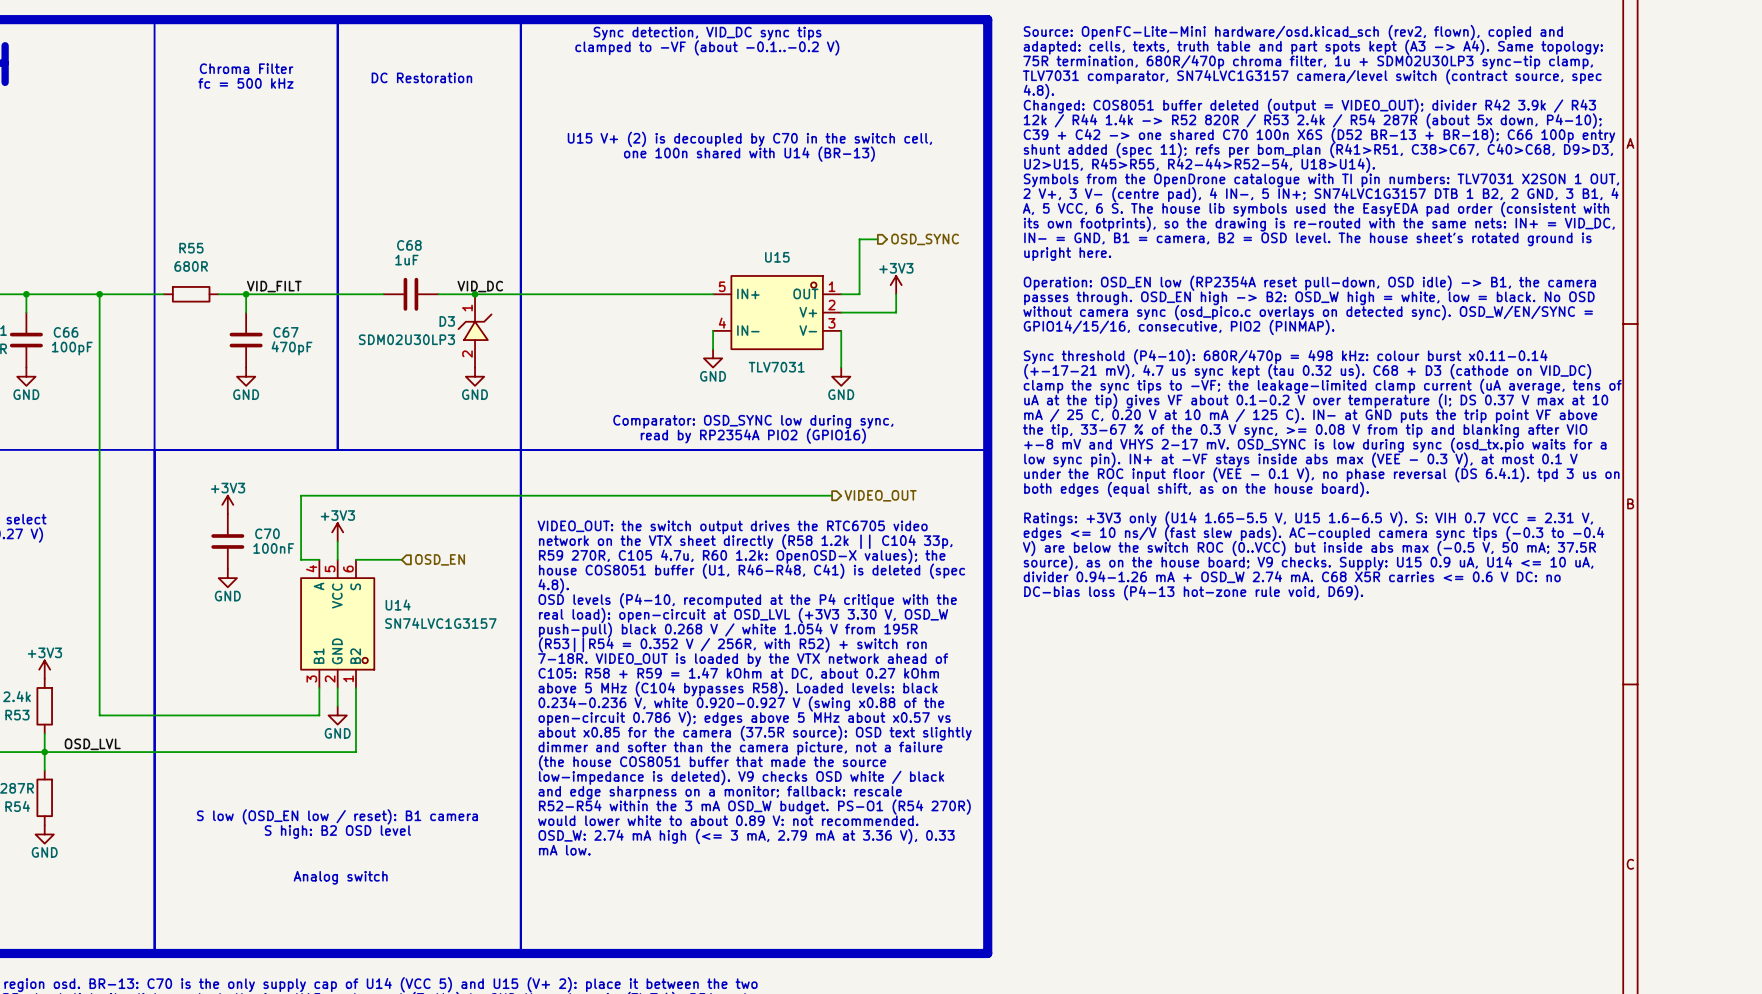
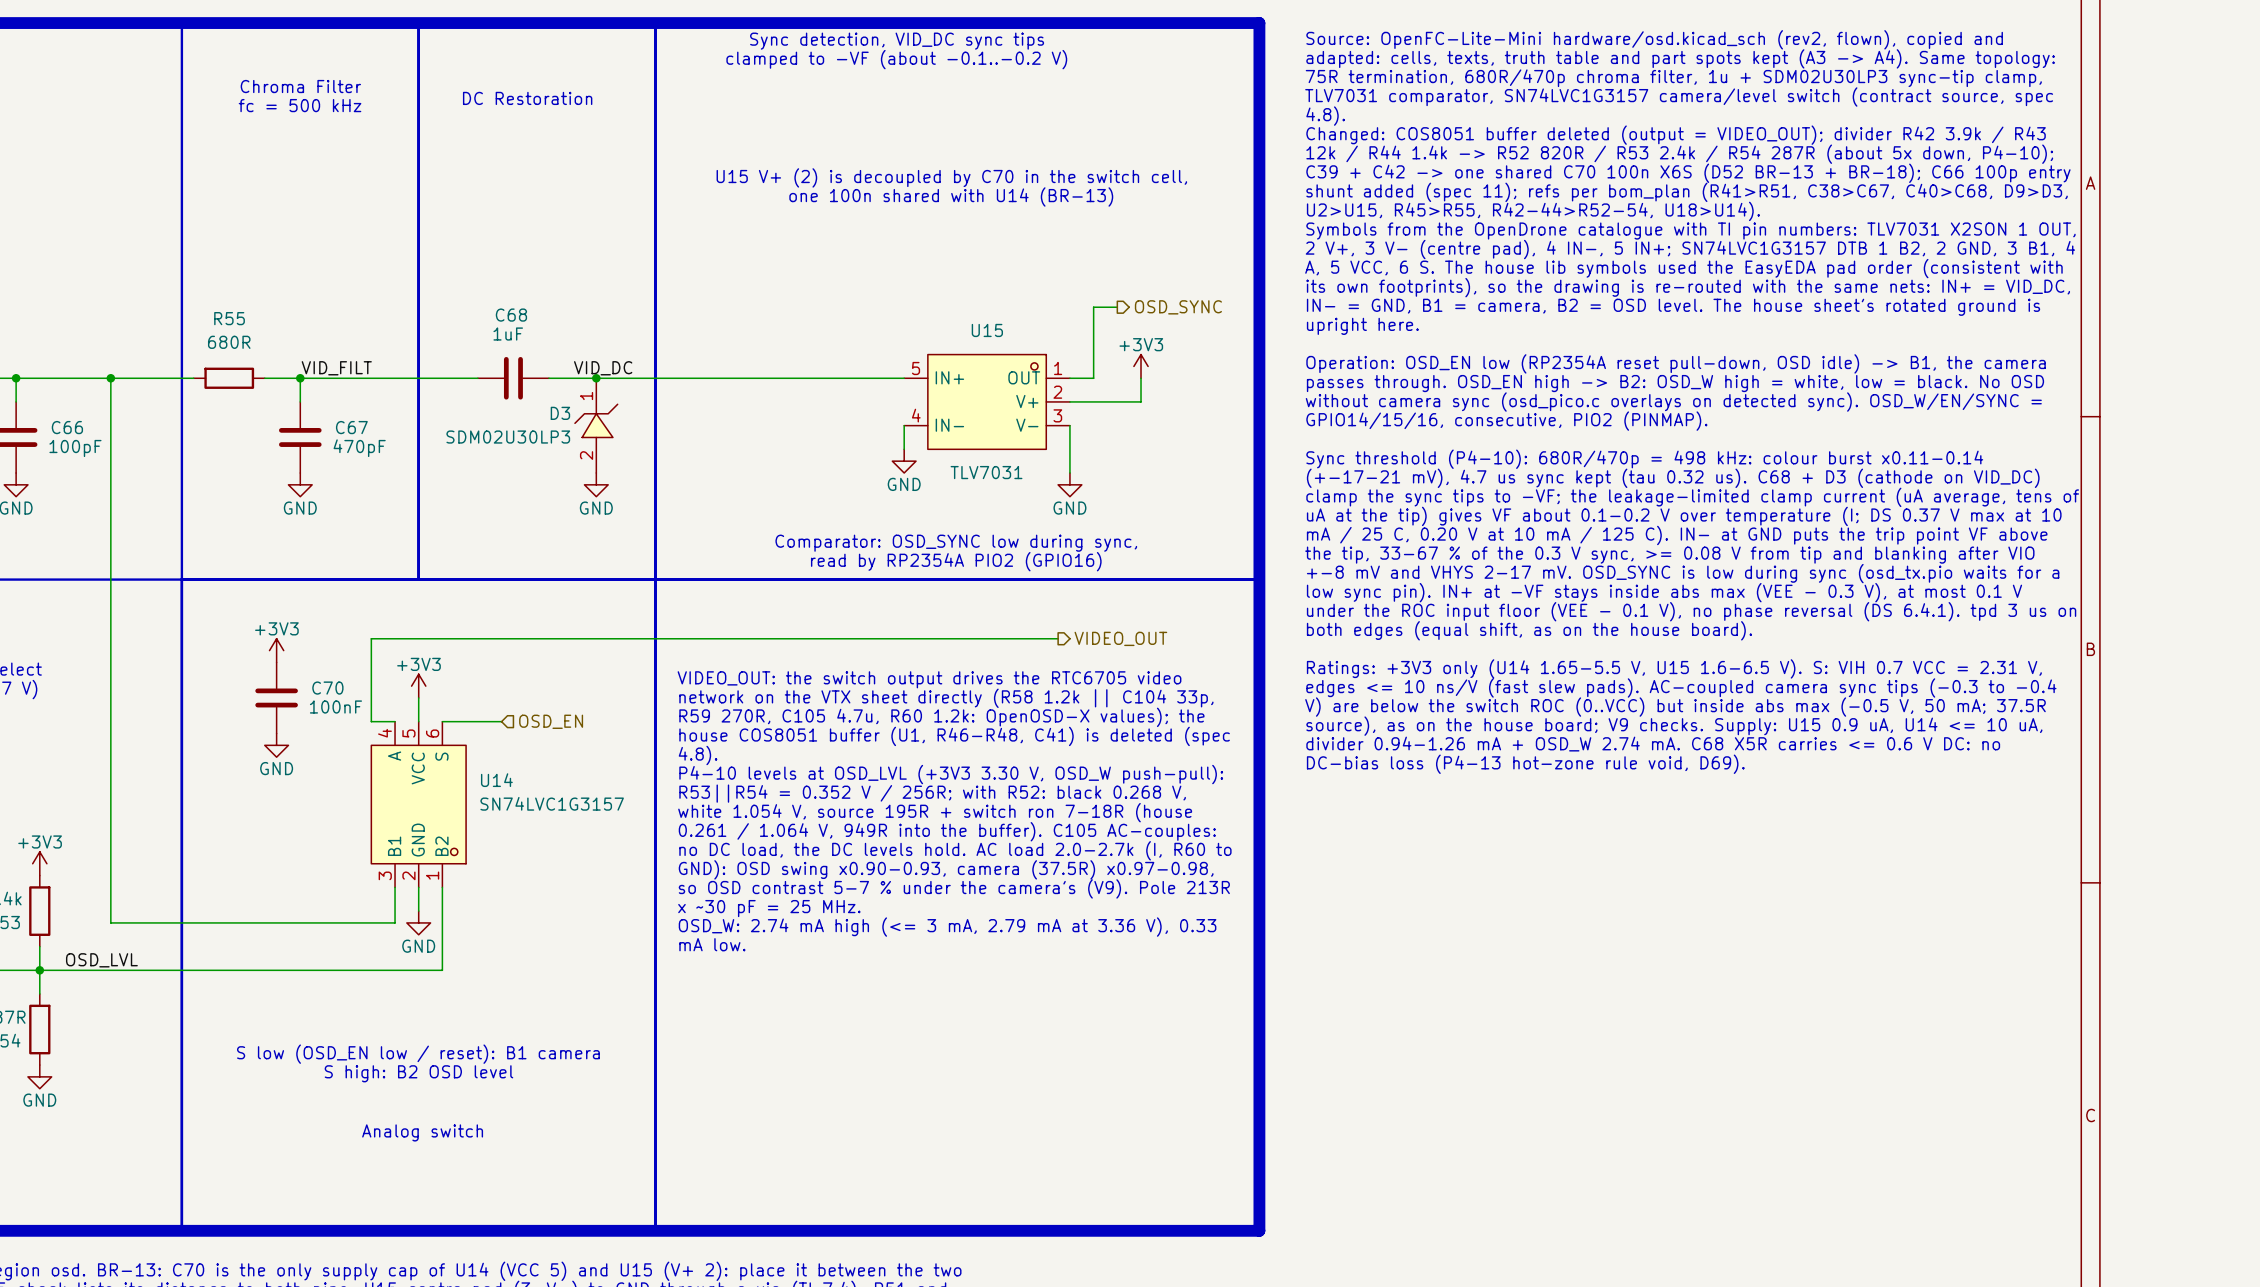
text: OSD levels (P4-10, recomputed at the P4 critique with the (747, 600) -> P4-10 levels at OSD_LVL (+3V3 3.30 V, OSD_W push-pull): (951, 774)
text: real load): open-circuit at OSD_LVL (+3V3 3.30 V, OSD_W (743, 615) -> R53||R54 = 0.352 V / 256R; with R52: black 0.268 V, (932, 793)
text: push-pull) black 0.268 V / white 1.054 V from 195R (728, 630) -> white 1.054 V, source 195R + switch ron 7-18R (house (935, 812)
text: (R53||R54 = 0.352 V / 256R, with R52) + switch ron (732, 644) -> 0.261 / 1.064 V, 949R into the buffer). C105 AC-couples: (947, 831)
text: 7-18R. VIDEO_OUT is loaded by the VTX network ahead of (743, 660) -> no DC load, the DC levels hold. AC load 2.0-2.7k (I, R60 to (955, 850)
text: C105: R58 + R59 = 1.47 kOhm at DC, about 0.27 kOhm (738, 673) -> GND): OSD swing x0.90-0.93, camera (37.5R) x0.97-0.98, (946, 869)
text: above 5 MHz (C104 bypasses R58). Loaded levels: black (738, 689) -> so OSD contrast 5-7 % under the camera's (V9). Pole 213R (954, 888)
text: 0.234-0.236 V, white 0.920-0.927 V (swing x0.88 of the (741, 703) -> x ~30 pF = 25 MHz. (769, 908)
text: open-circuit 0.786 V); edges above 5 MHz about x0.57 vs (744, 718) -> OSD_W: 2.74 mA high (<= 3 mA, 2.79 mA at 3.36 V), 0.33 (947, 927)
text: about x0.85 for the camera (37.5R source): OSD text slightly (755, 733) -> mA low. (712, 944)
text: dimmer and softer than the camera picture, not a failure (740, 748) -> none
text: (the house COS8051 buffer that made the source (712, 762) -> none
text: low-impedance is deleted). V9 checks OSD white / black (741, 777) -> none
text: and edge sharpness on a monitor; fallback: rescale (720, 792) -> none
text: R52-R54 within the 3 mA OSD_W budget. PS-O1 (R54 270R) (754, 807) -> none
text: would lower white to about 0.89 V: not recommended. (728, 820) -> none
text: OSD_W: 2.74 mA high (<= 3 mA, 2.79 mA at 3.36 V), 0.33 (746, 836) -> none
text: mA low. (564, 850) -> none

